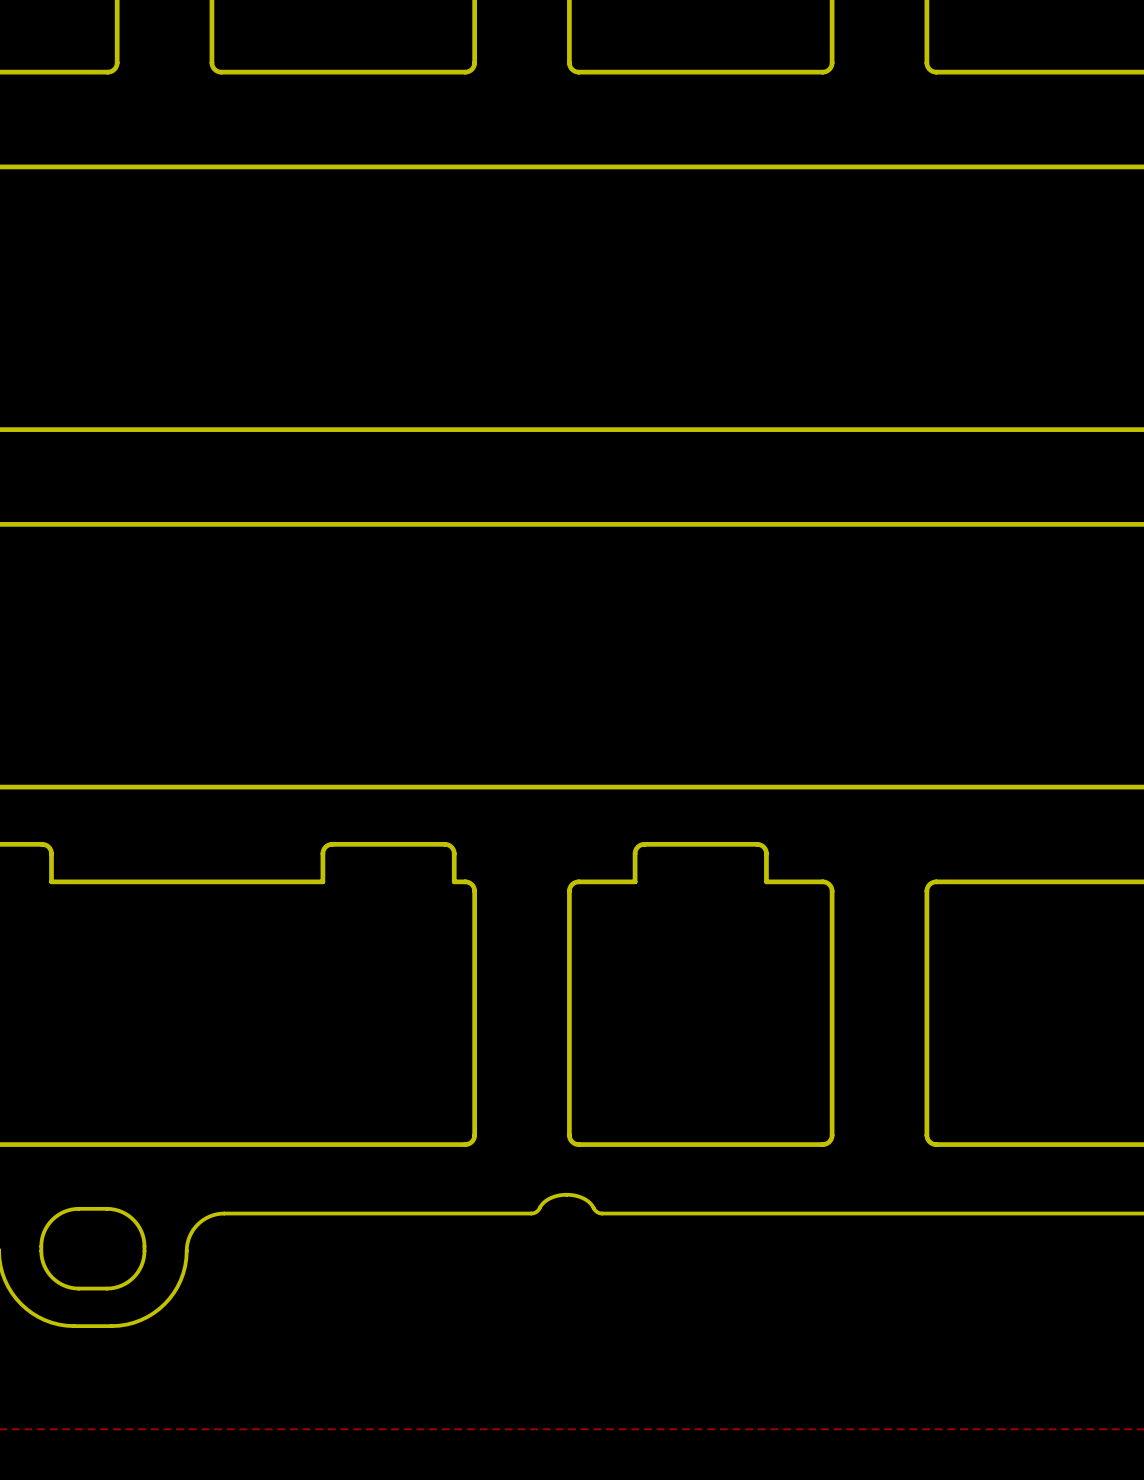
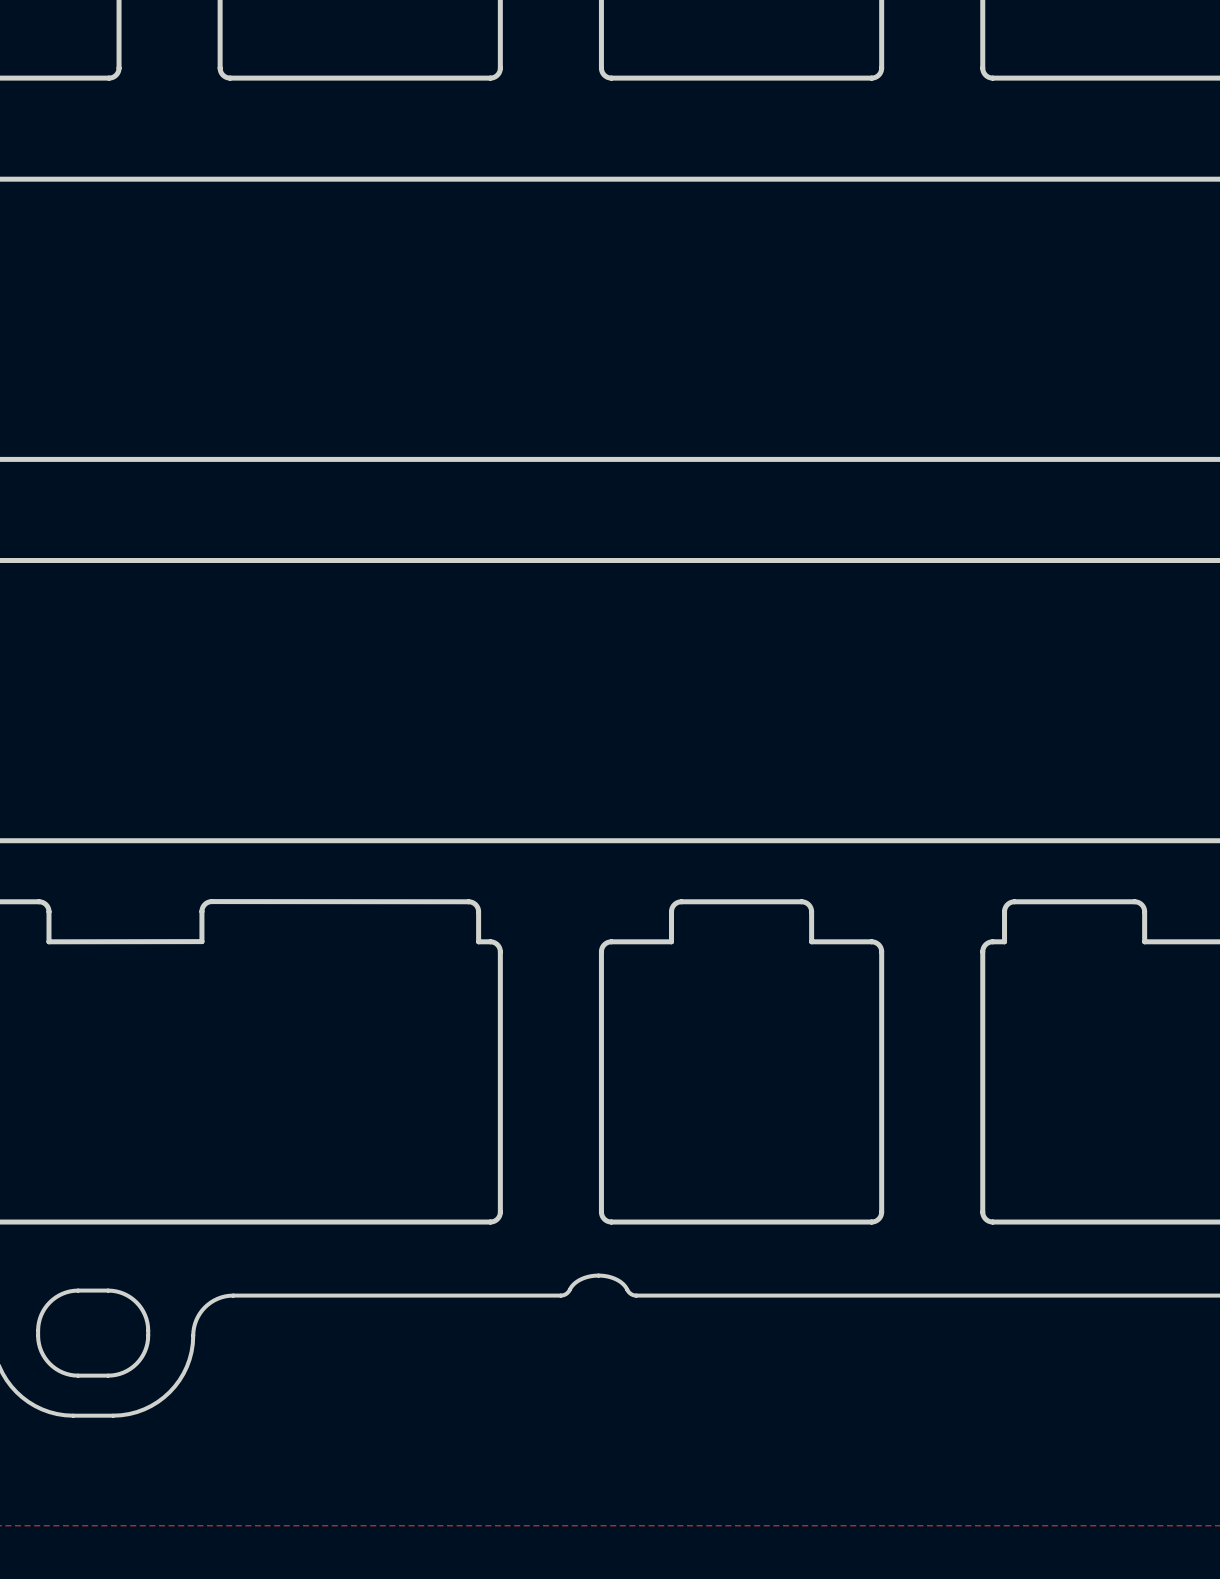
board edge: (444, 844) (329, 844) (323, 851) (322, 881) (51, 881) -> (468, 901) (210, 901) (205, 903) (202, 909) (201, 941) (49, 941)
board edge: (947, 881) (1078, 881) -> (1004, 941) (1004, 909) (1008, 904) (1014, 901) (1137, 902) (1144, 909) (1144, 941)

